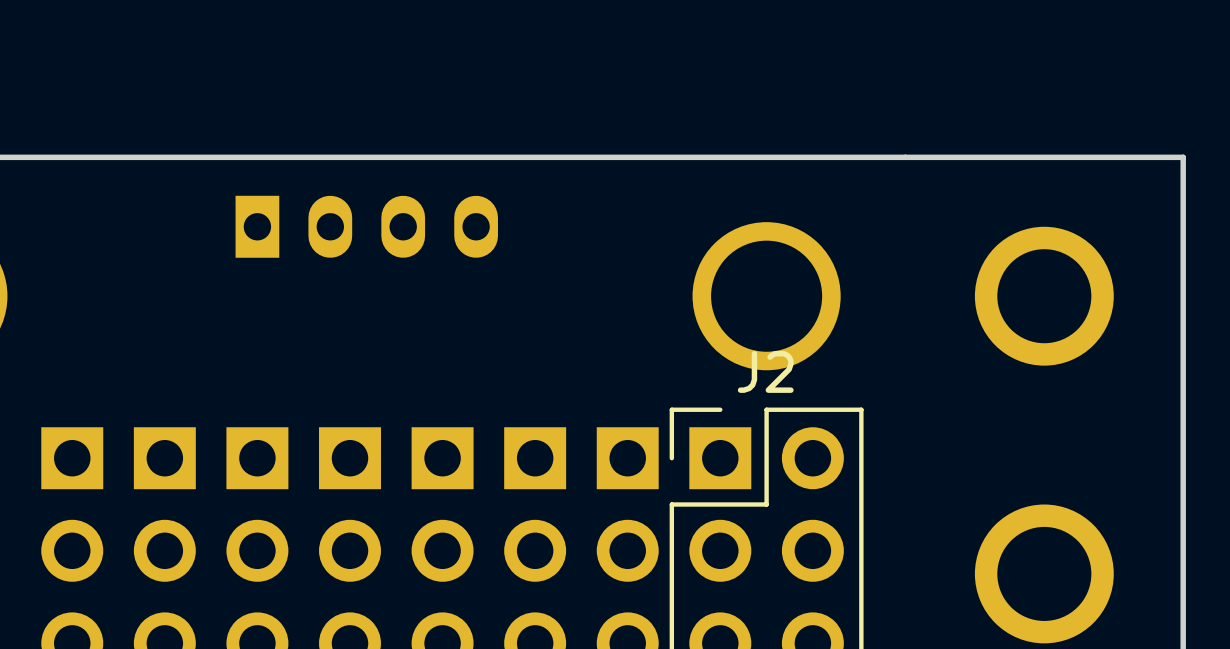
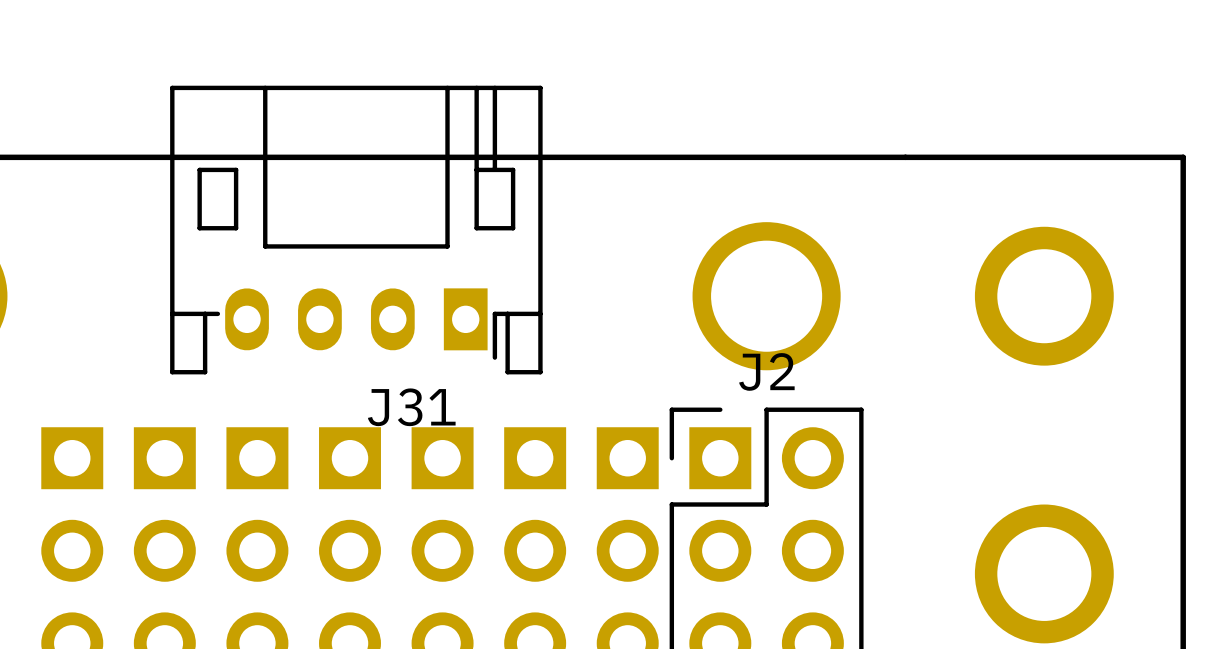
J31 side: top (366, 226) -> bottom (356, 230)

